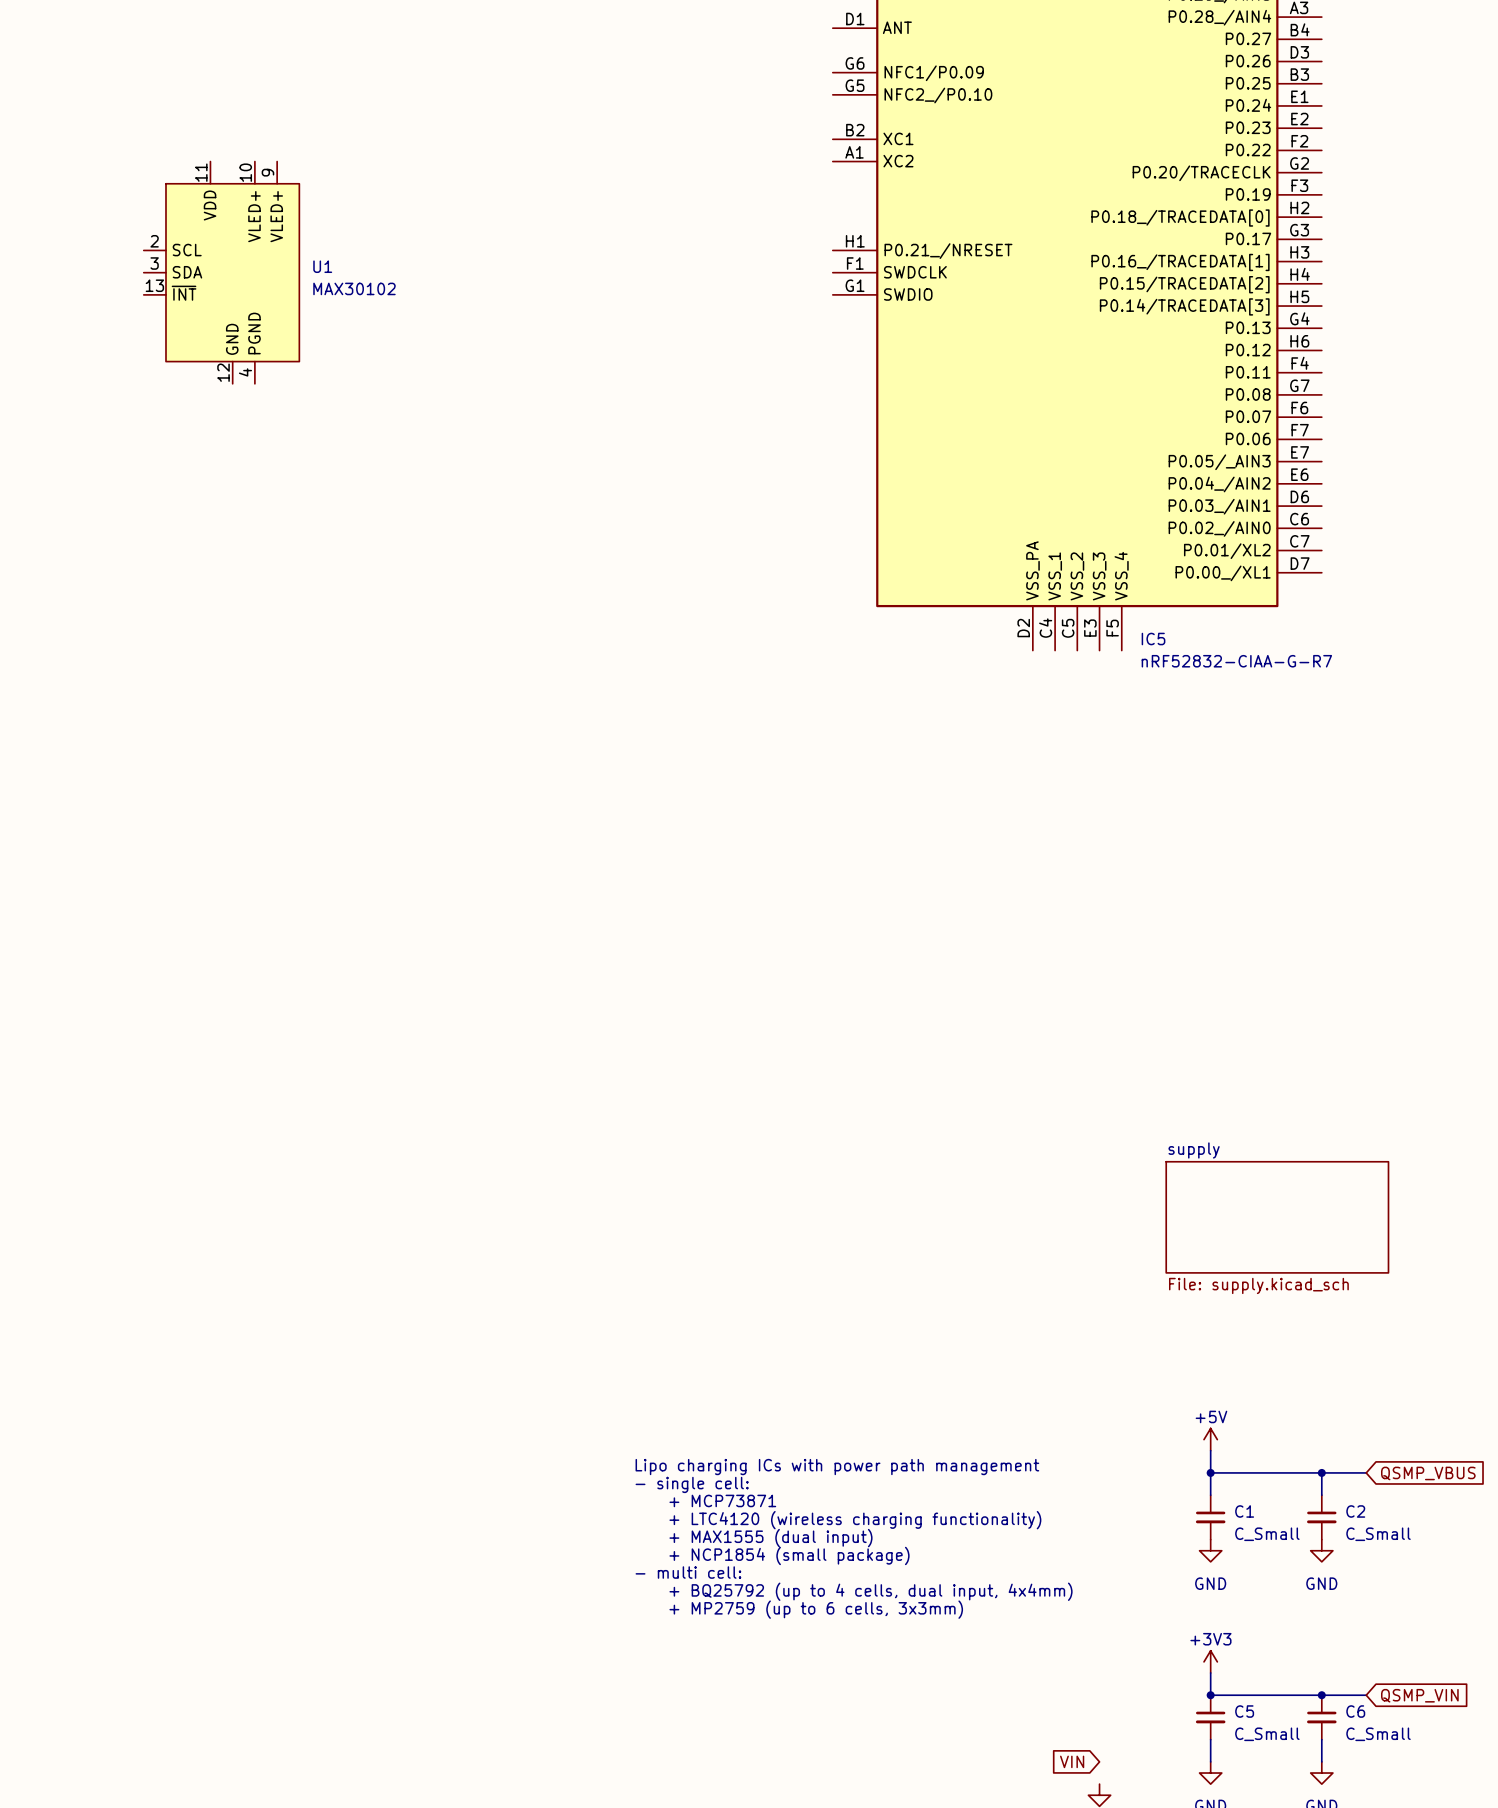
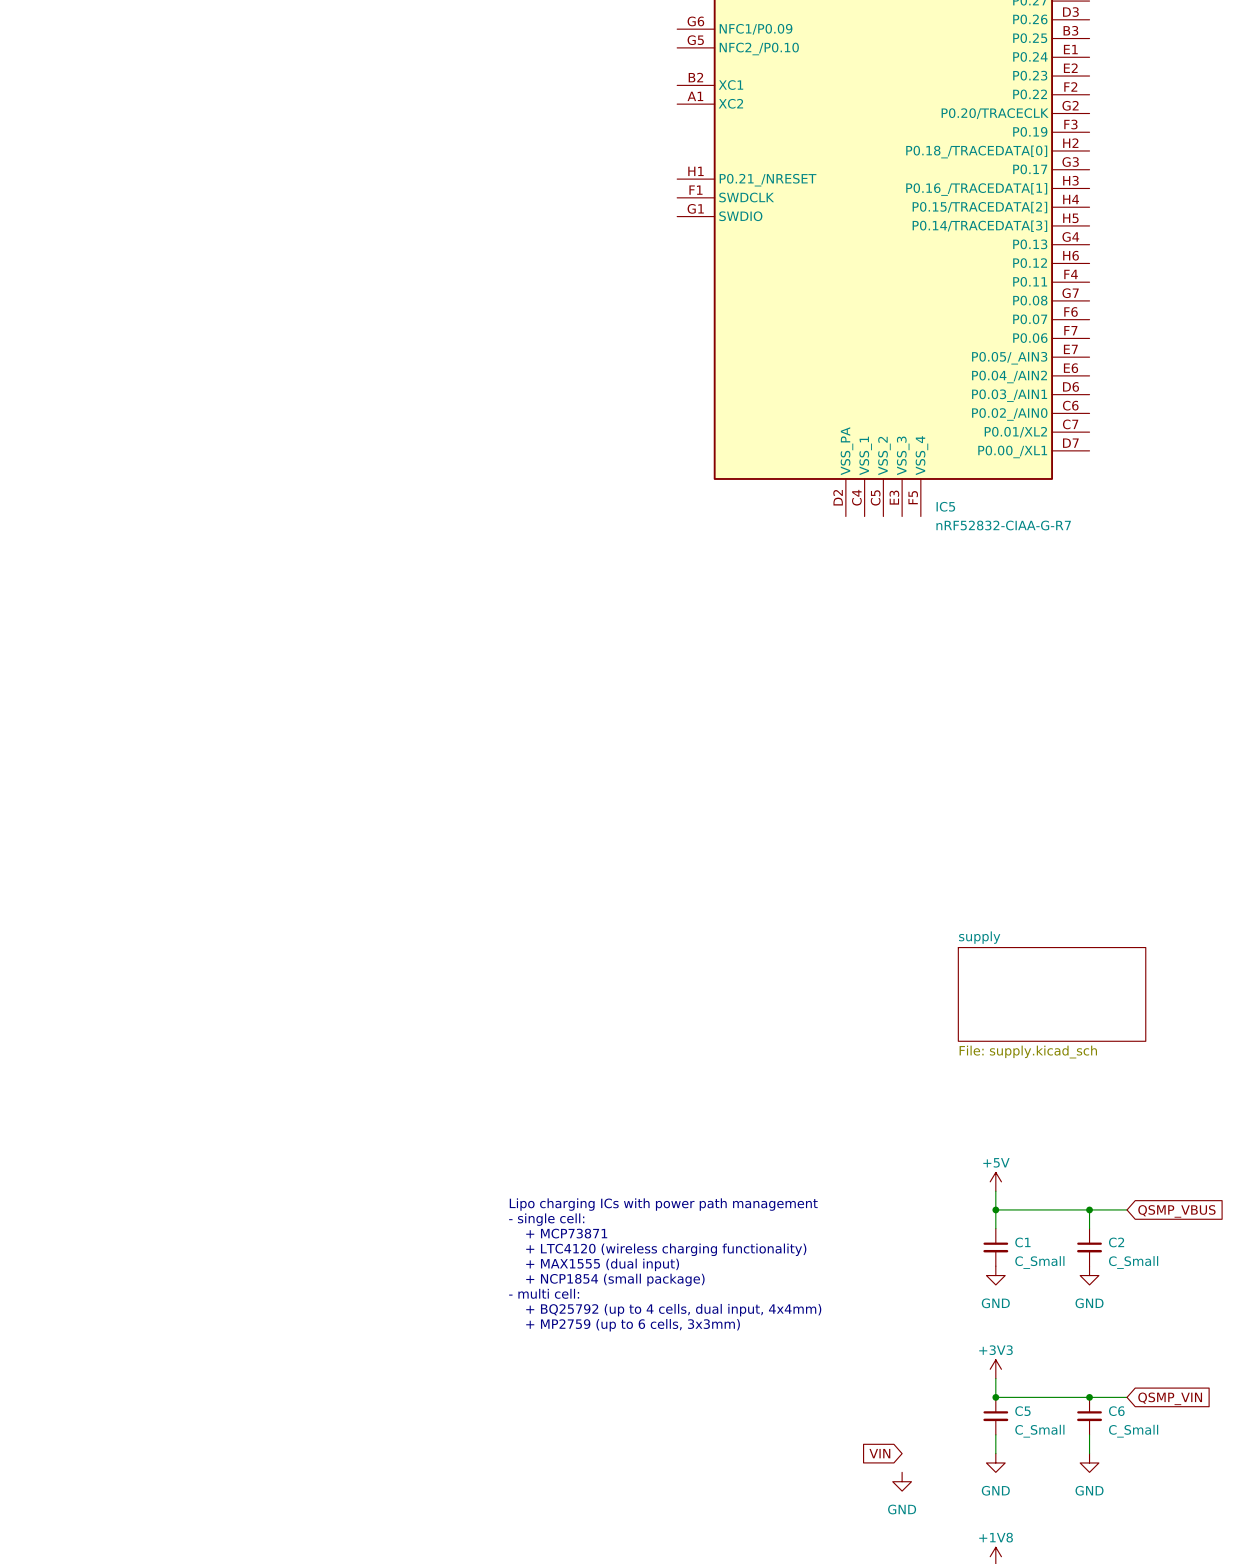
U1: MAX30102 (221, 272) -> none

